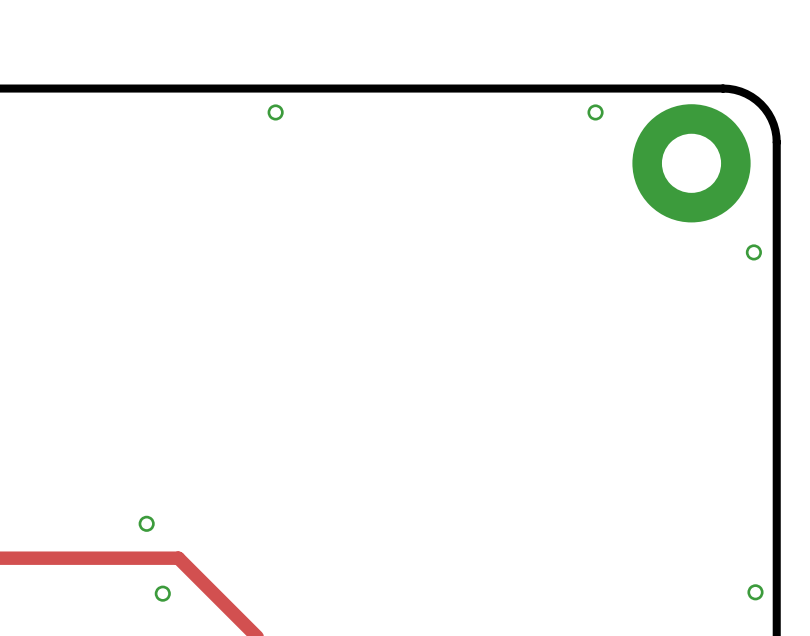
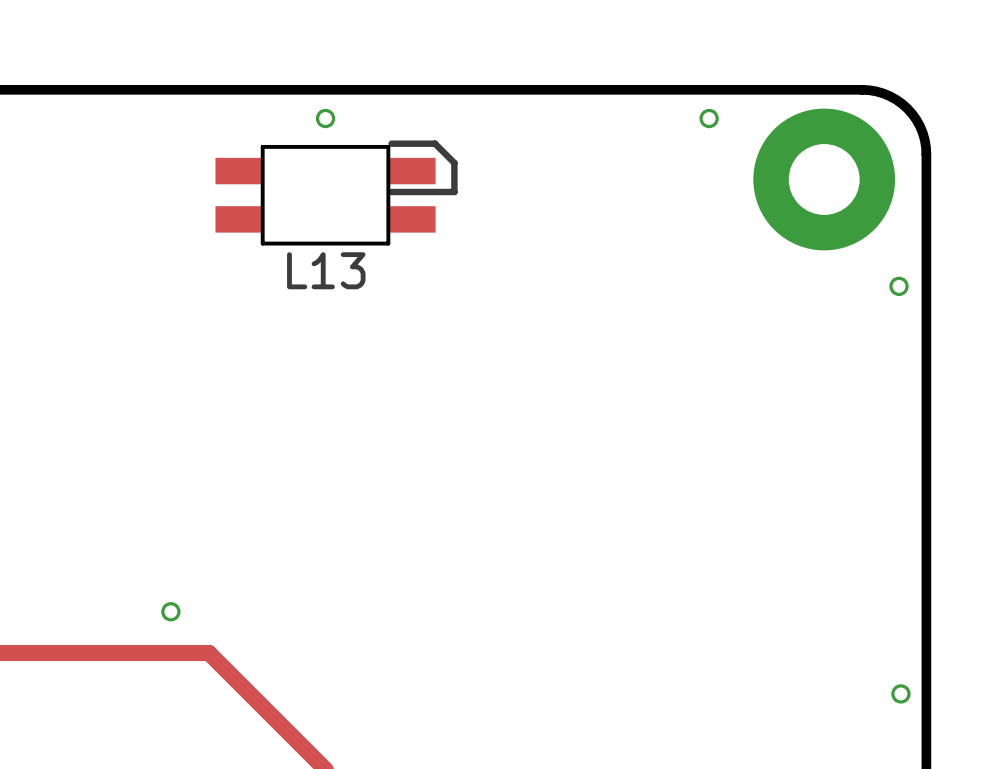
L13: none -> (336, 192)
via: (162, 593) -> none

